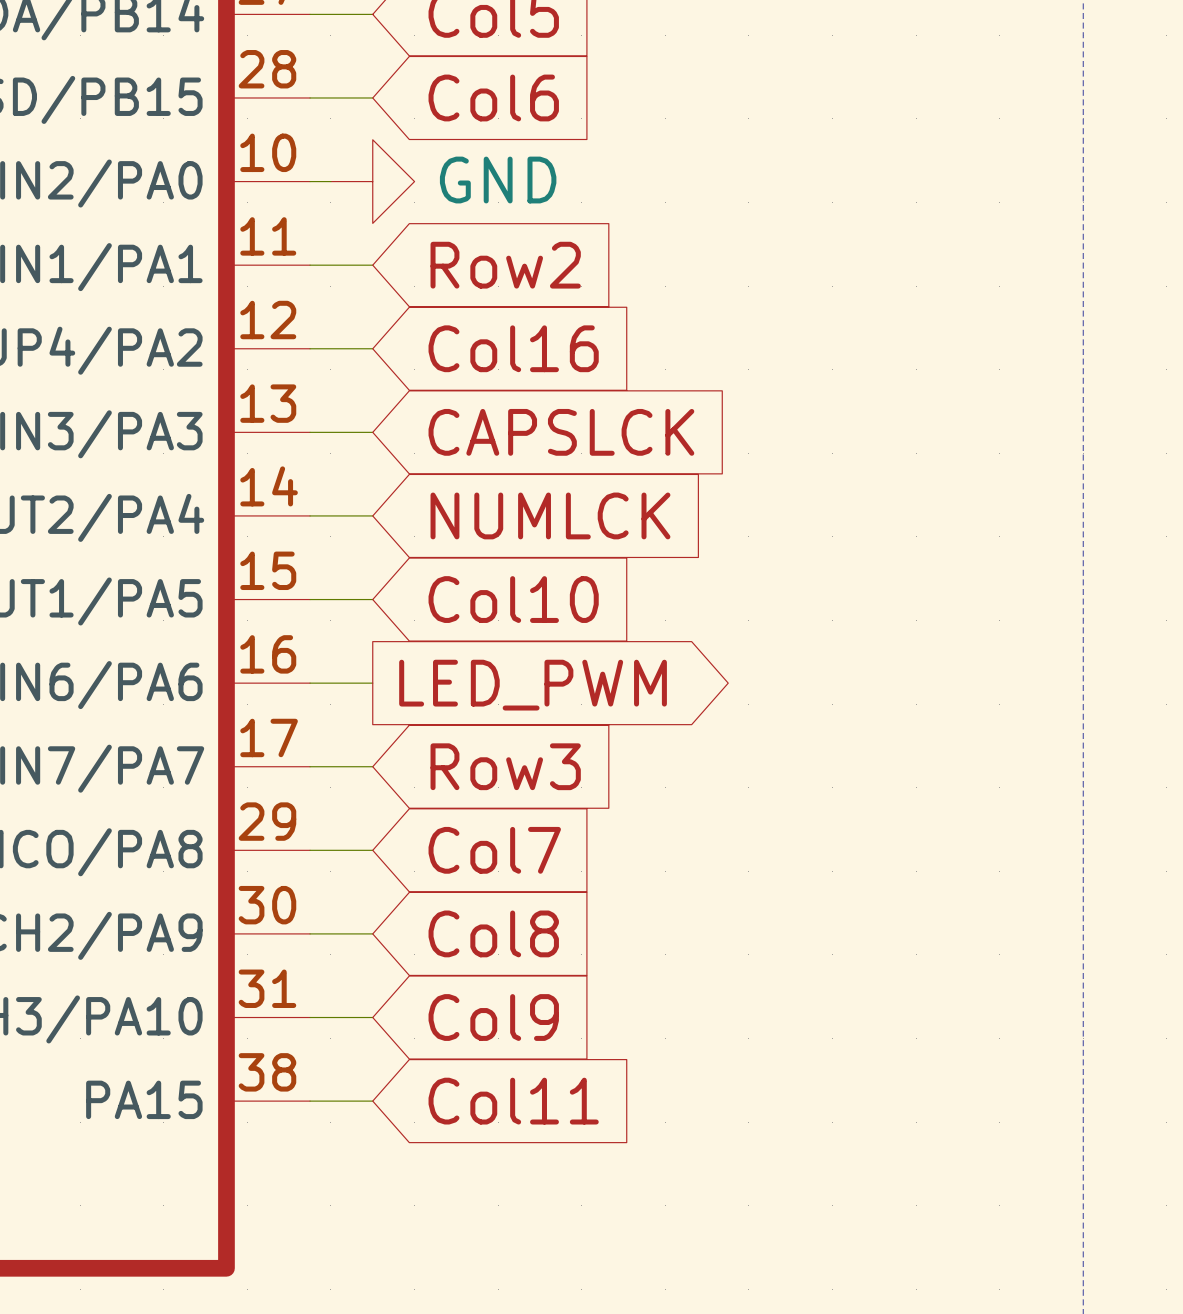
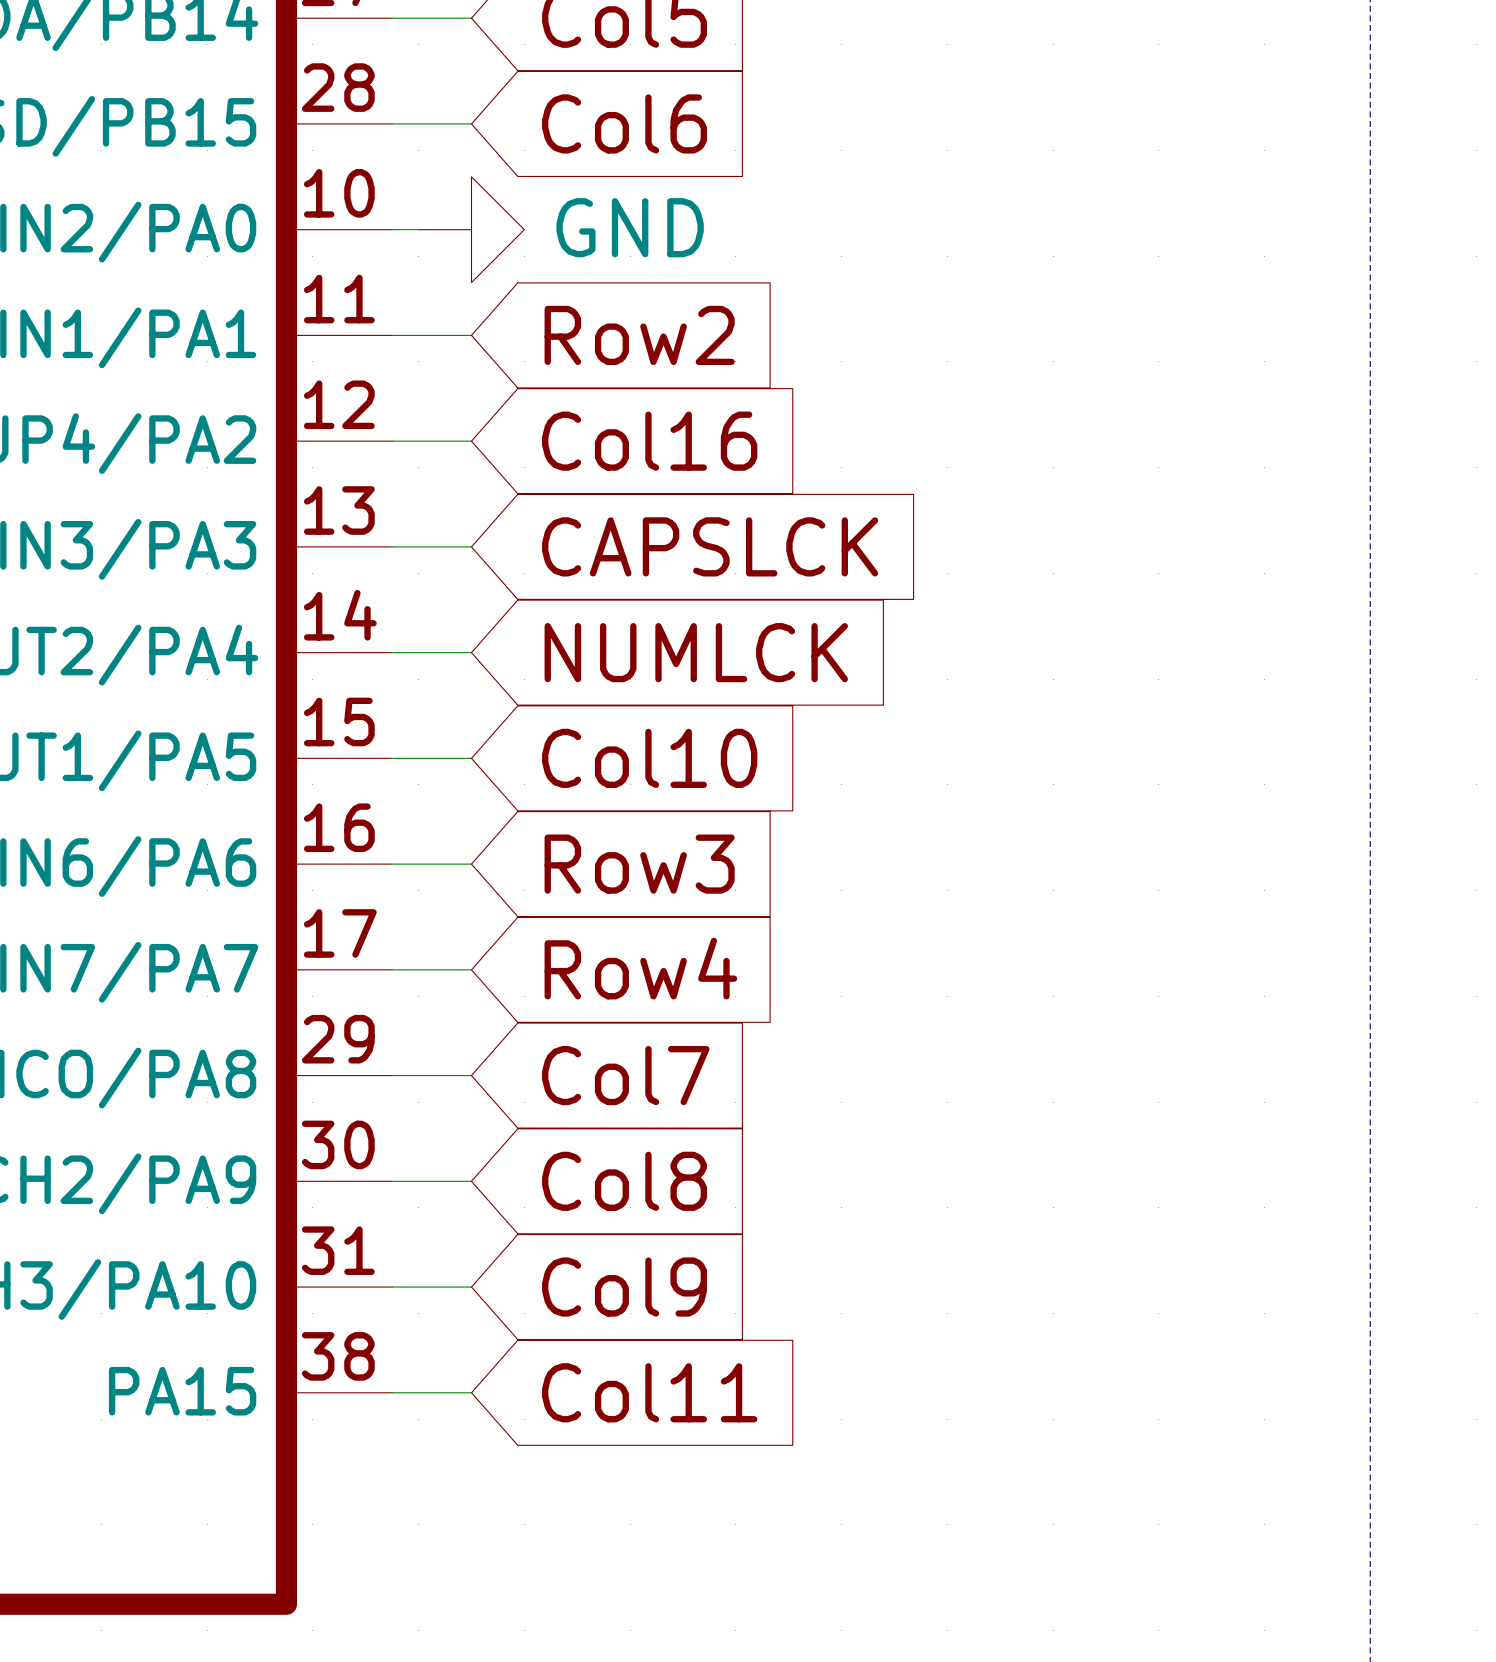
global label shape: output (533, 685) -> input (639, 864)
global label: LED_PWM (533, 685) -> Row3 (639, 864)
global label: Row3 (505, 766) -> Row4 (640, 968)

